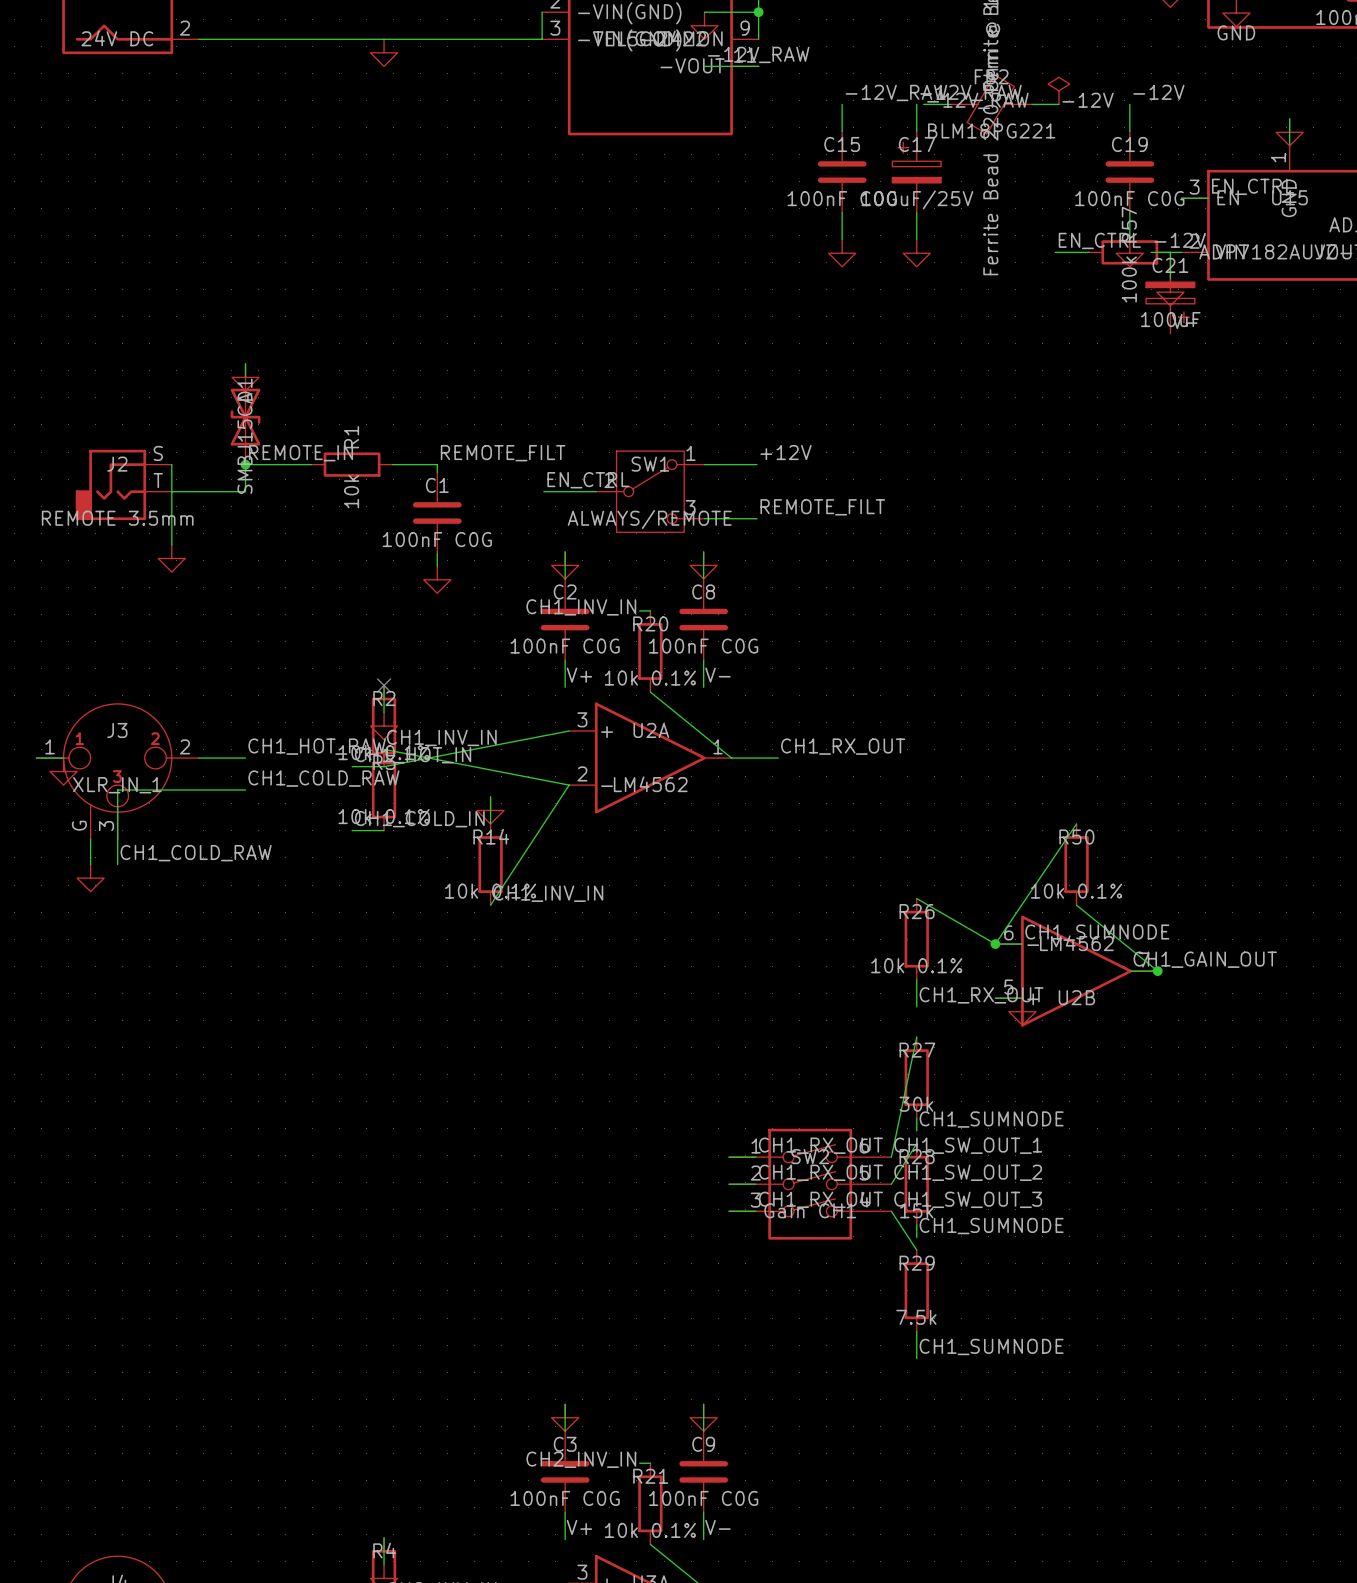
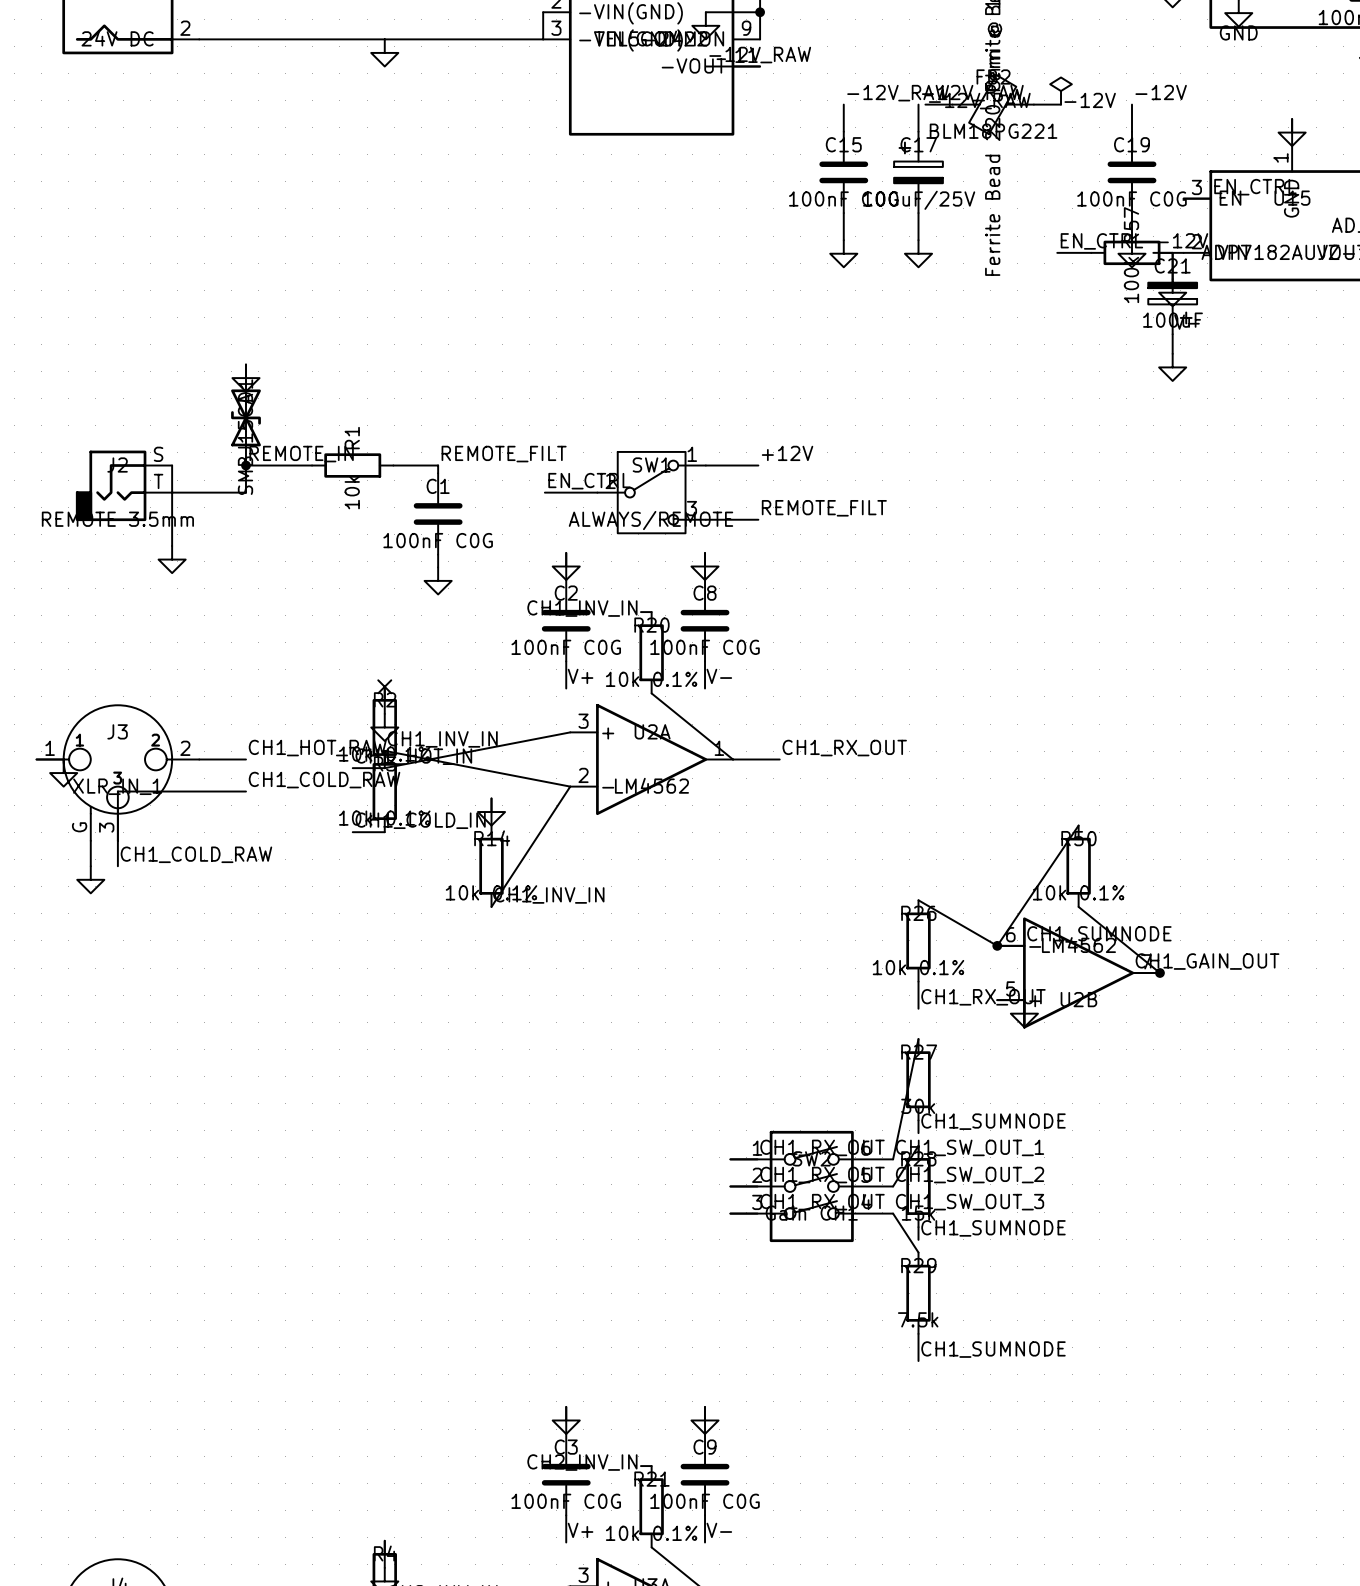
wire: none -> (1172, 334) (1172, 353)
power symbol: none -> (1172, 367)

